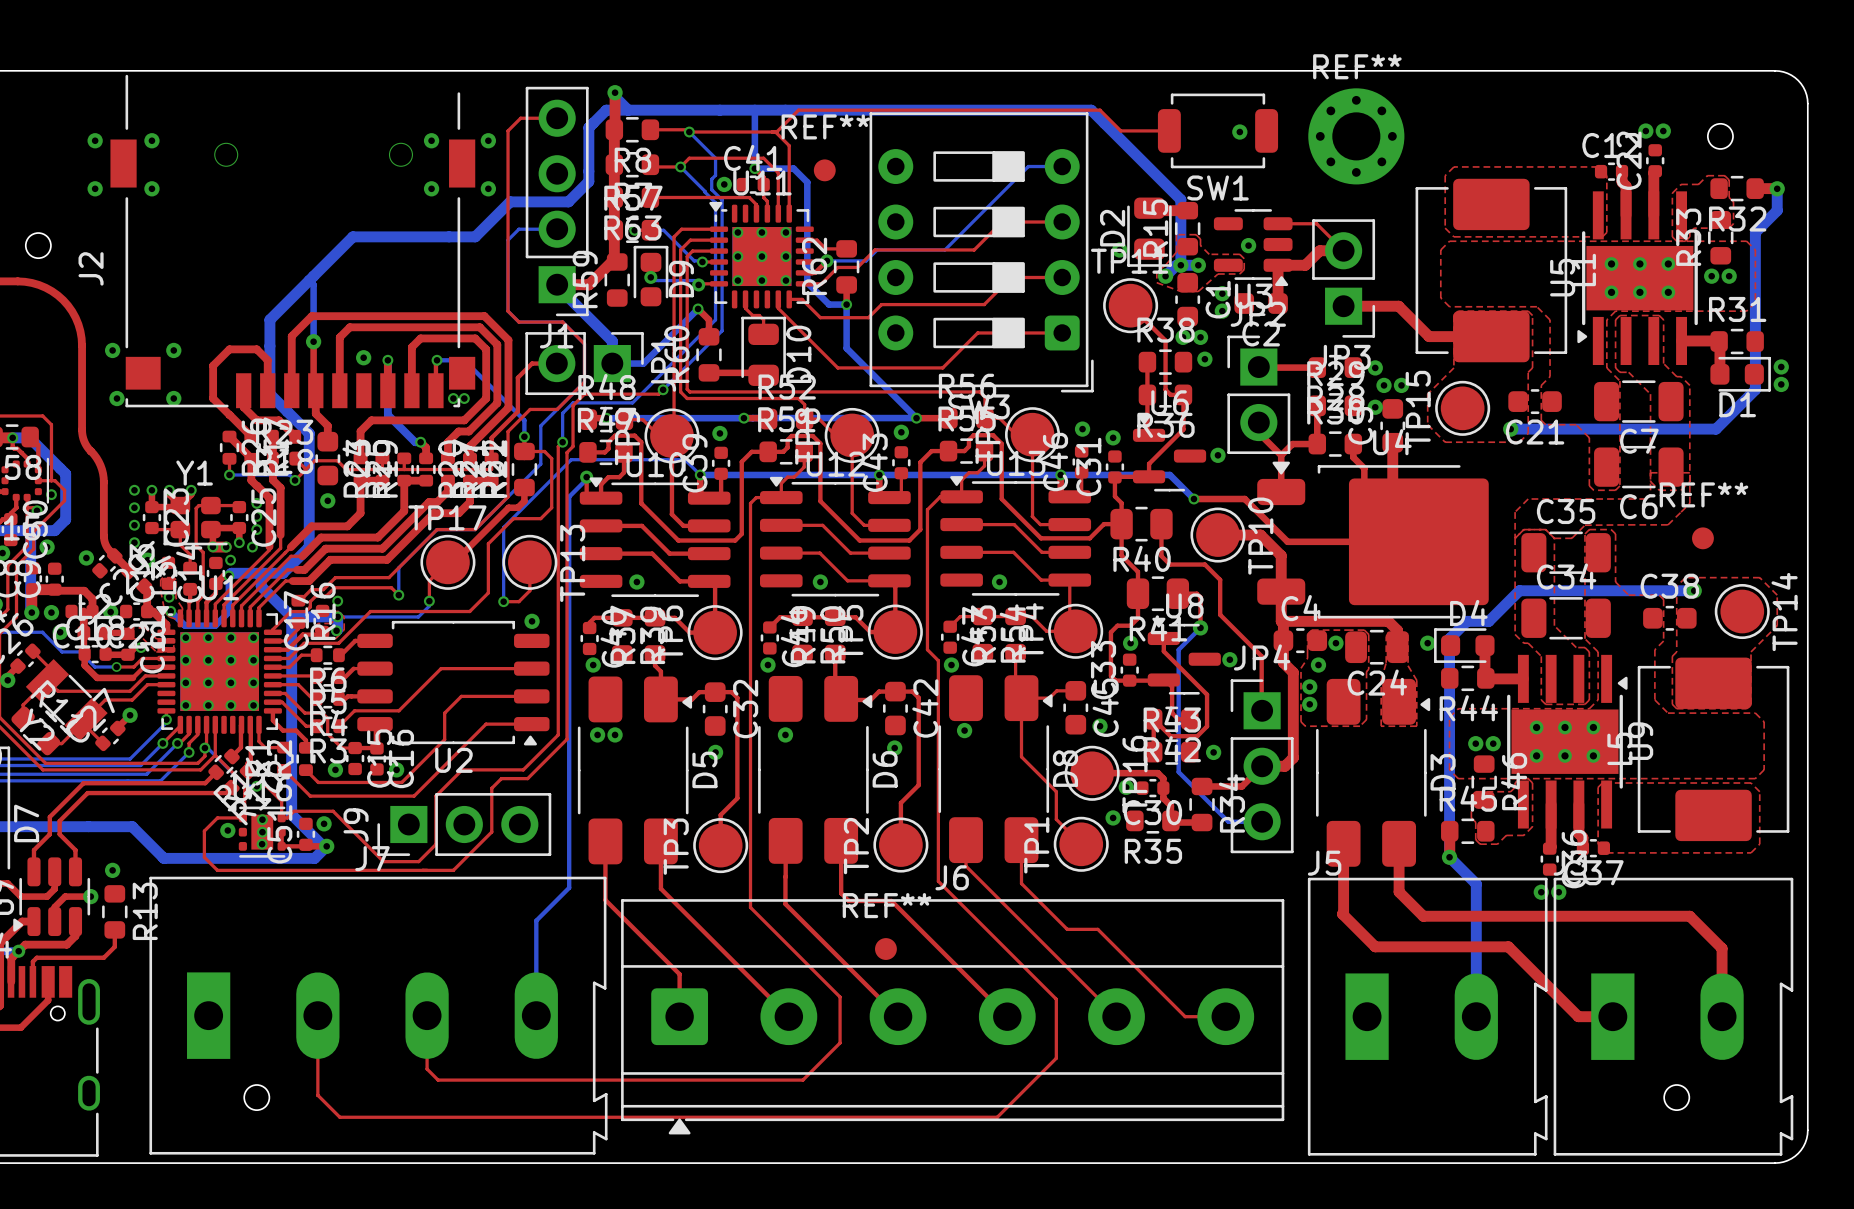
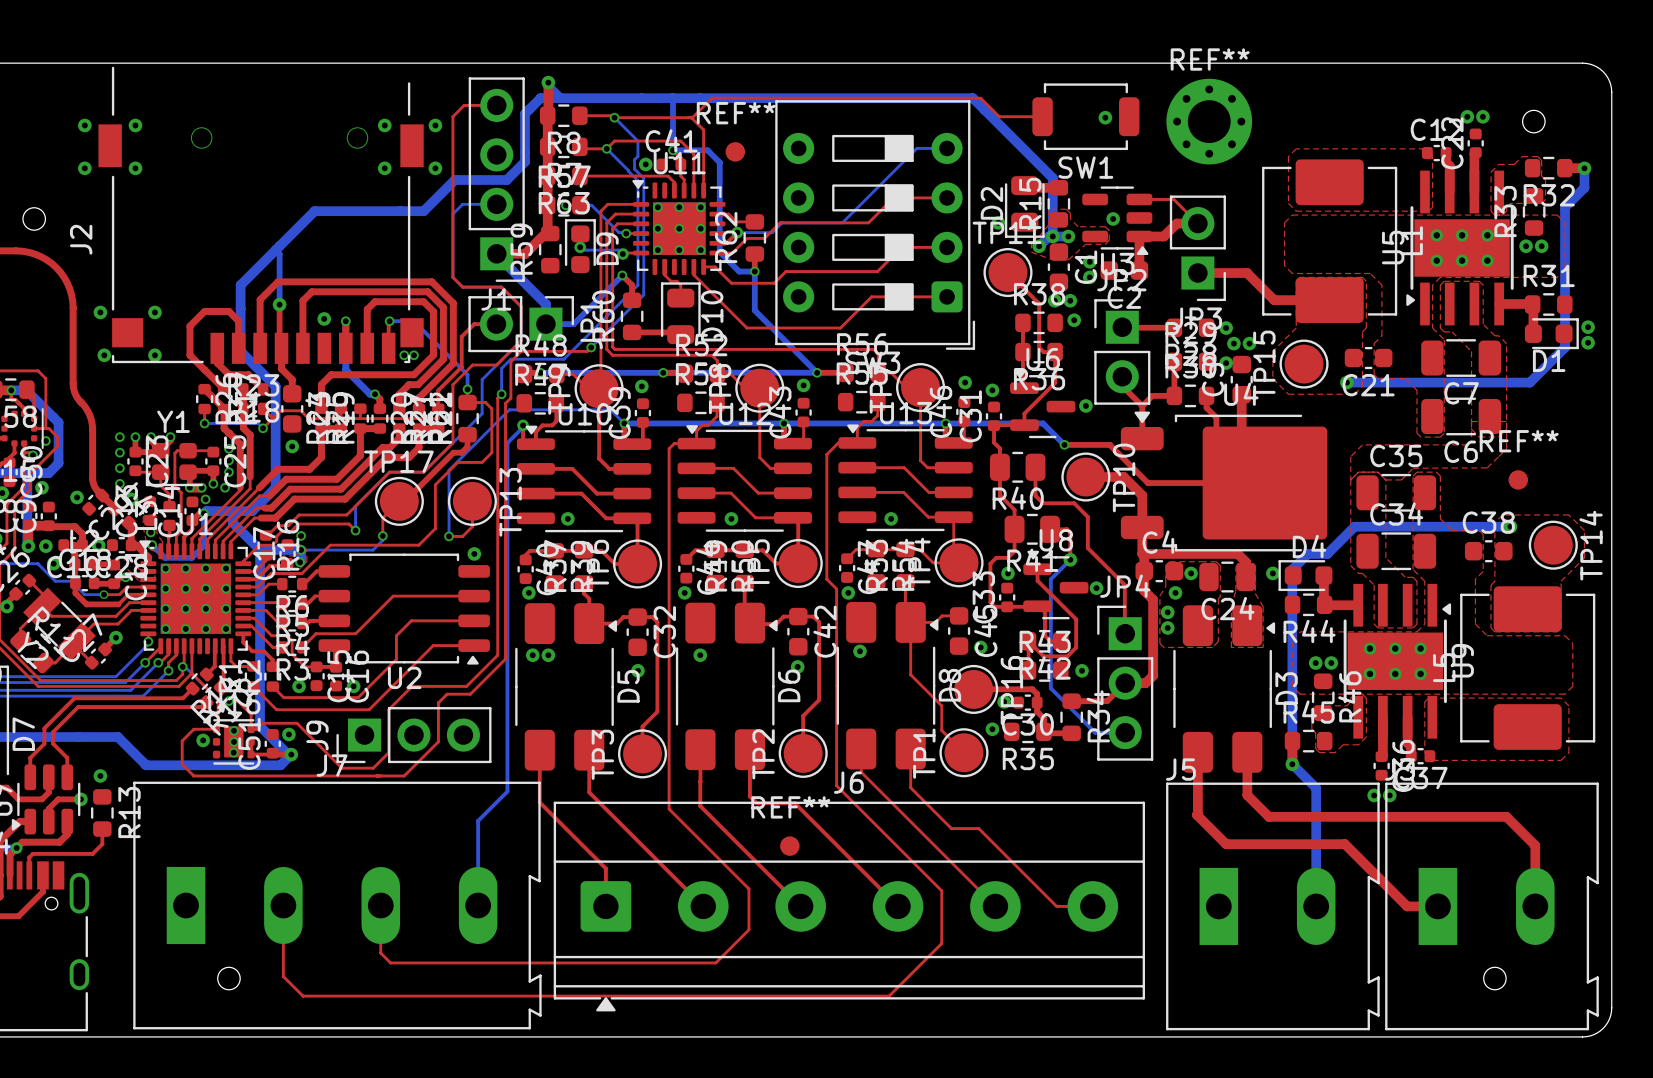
top track: (587, 452) (604, 452) (608, 448) (608, 442) (615, 435) (634, 435) (641, 442) (641, 503) (678, 540) (735, 540) (741, 533) (741, 461) (751, 451) (783, 451) (787, 447) (787, 440) (791, 435) (812, 435) (820, 443) (820, 501) (859, 540) (909, 540) (920, 529) (920, 462) (931, 451) (964, 451) (968, 446) (968, 440) (973, 435) (993, 435) (1001, 443) (1001, 499) (1041, 538) (1089, 538) (1104, 524) (1121, 524) -> none

